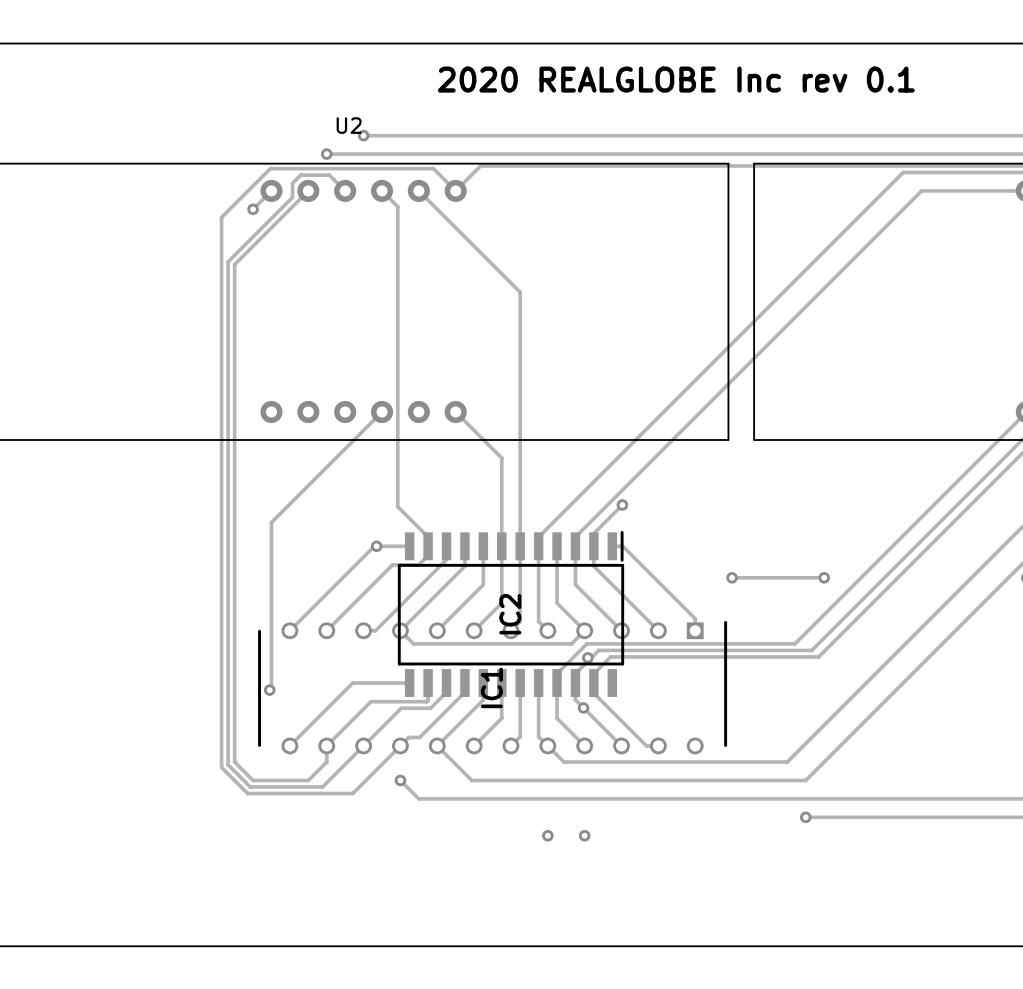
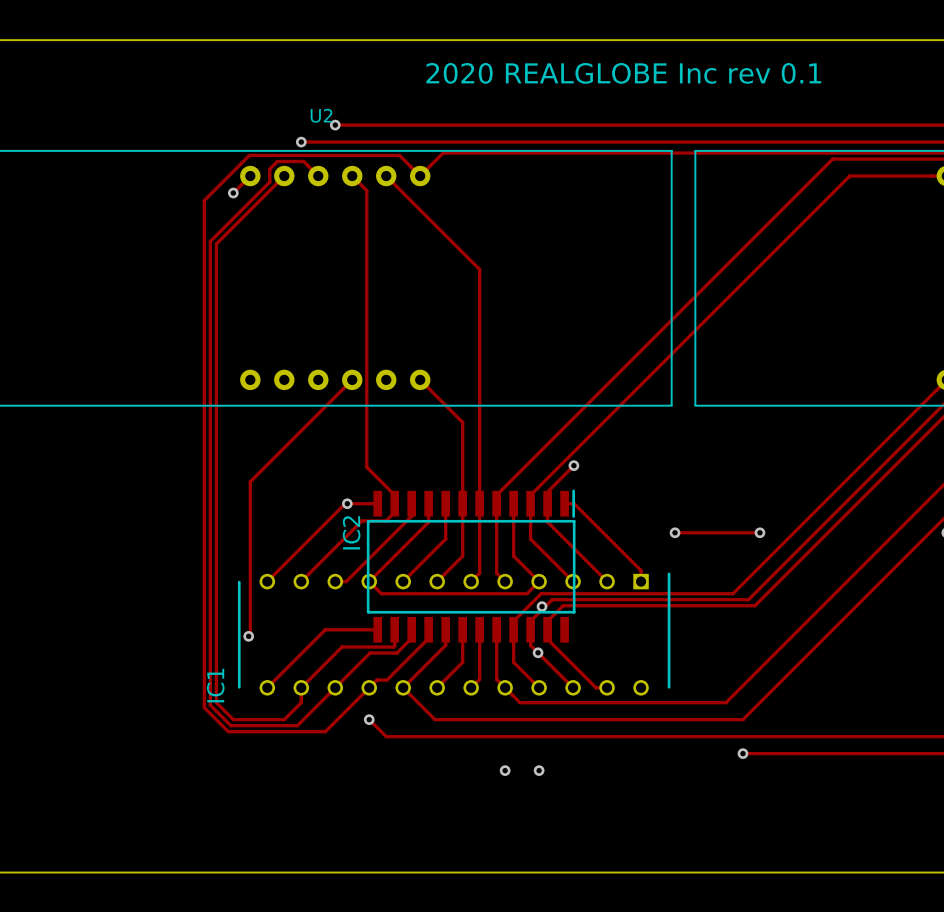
IC2 name position: IC2 (510, 614) -> IC2 (351, 532)
IC1 name position: IC1 (491, 687) -> IC1 (215, 685)

